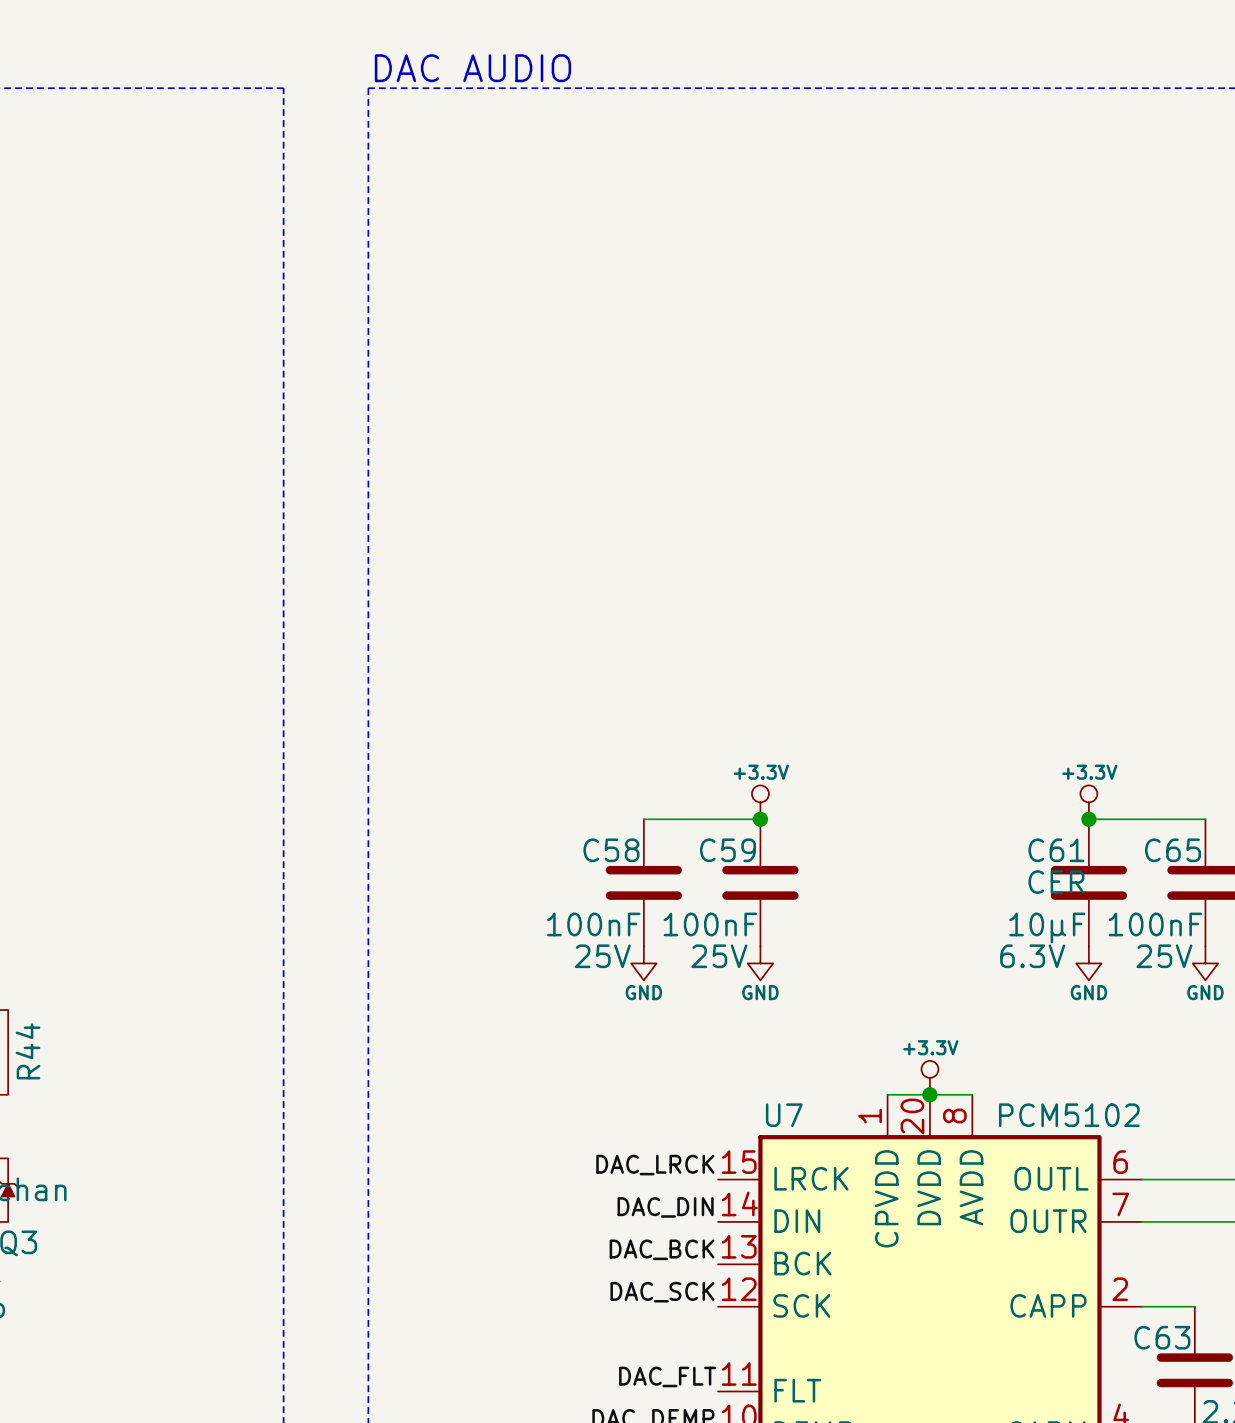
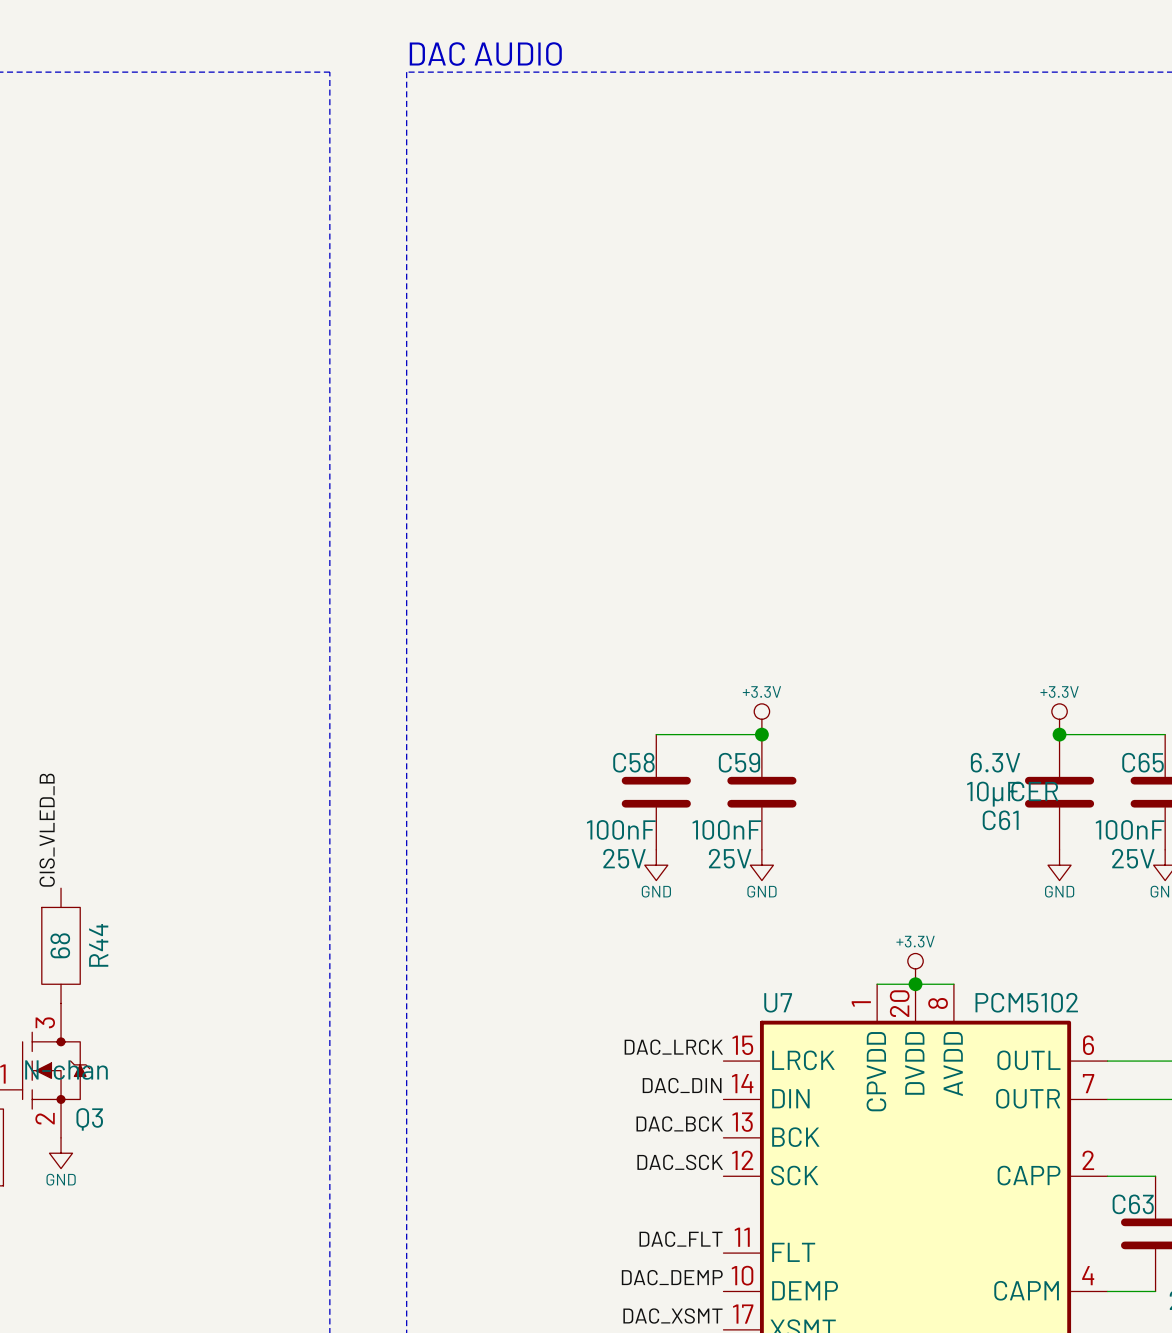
C61 name position: C61 (1056, 850) -> C61 (1000, 820)
C61 text position: 10µF (1047, 928) -> 10µF (993, 794)
C61 text position: 6.3V (1032, 956) -> 6.3V (995, 762)

